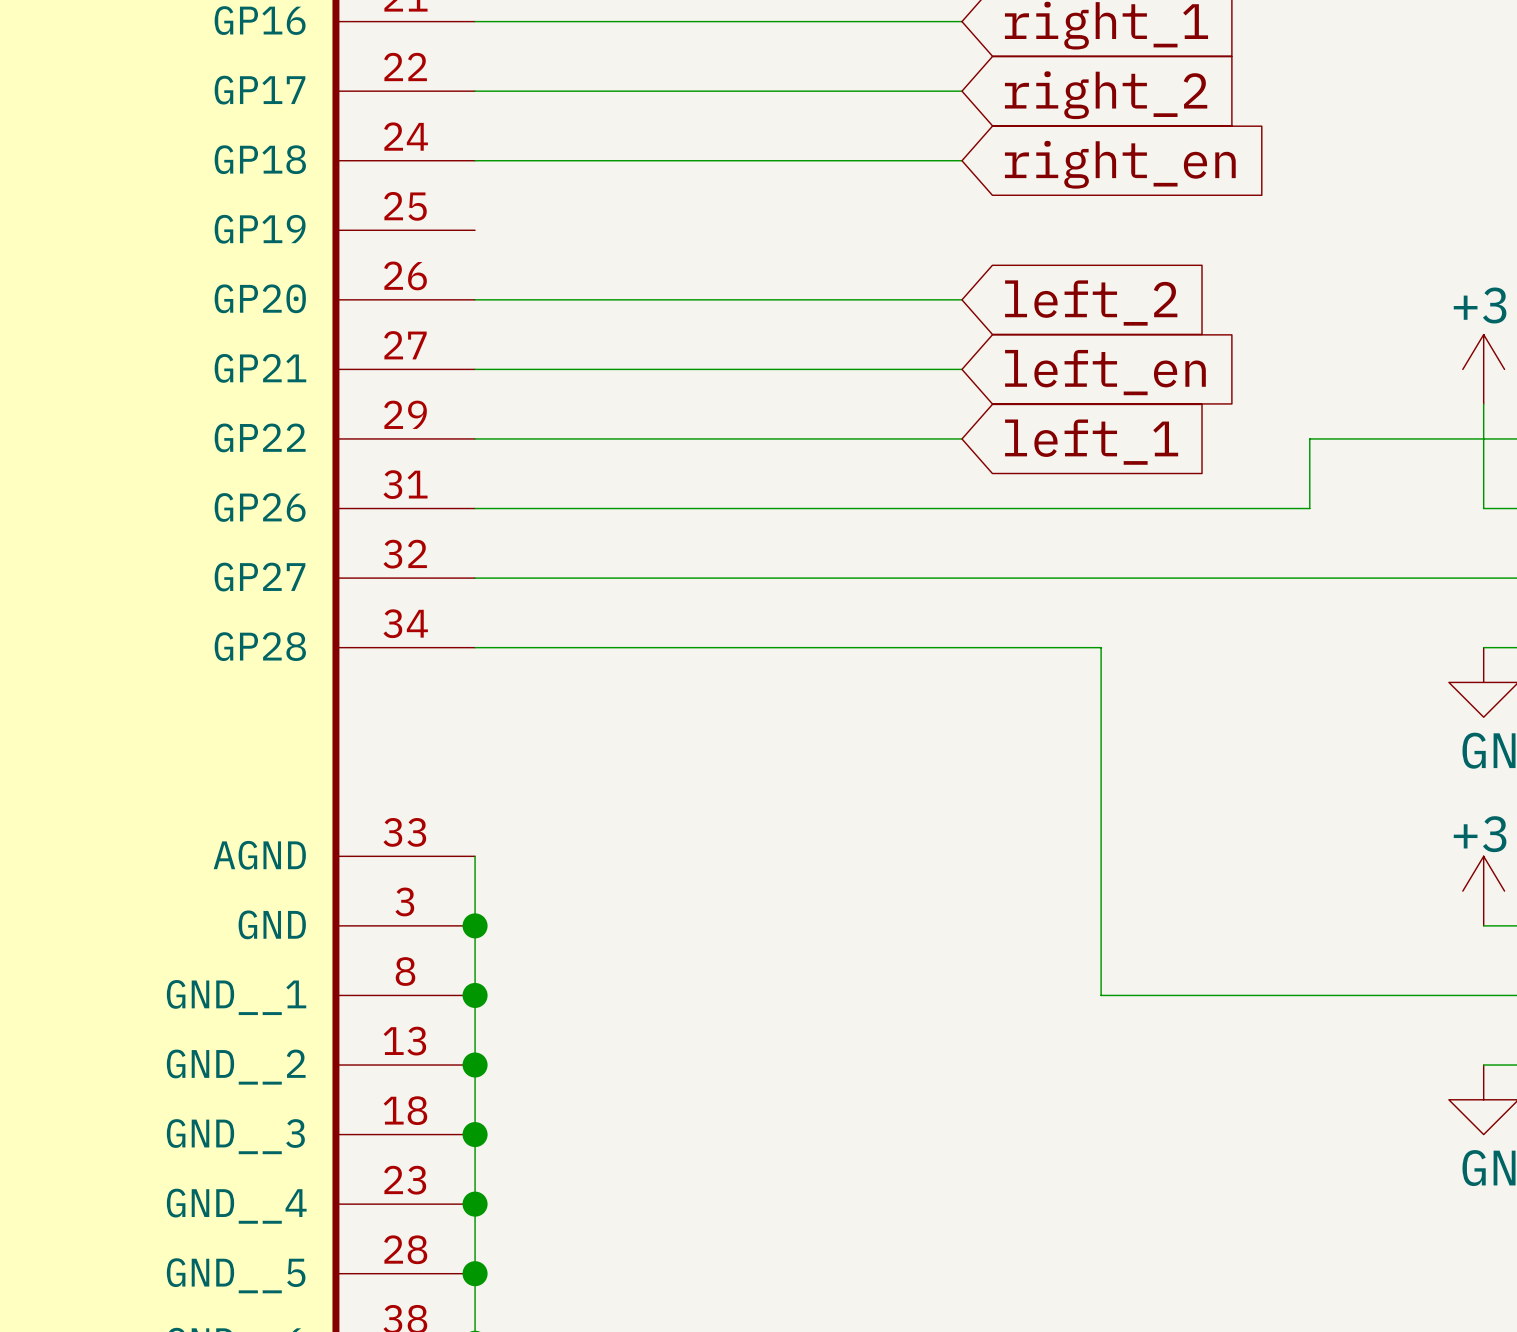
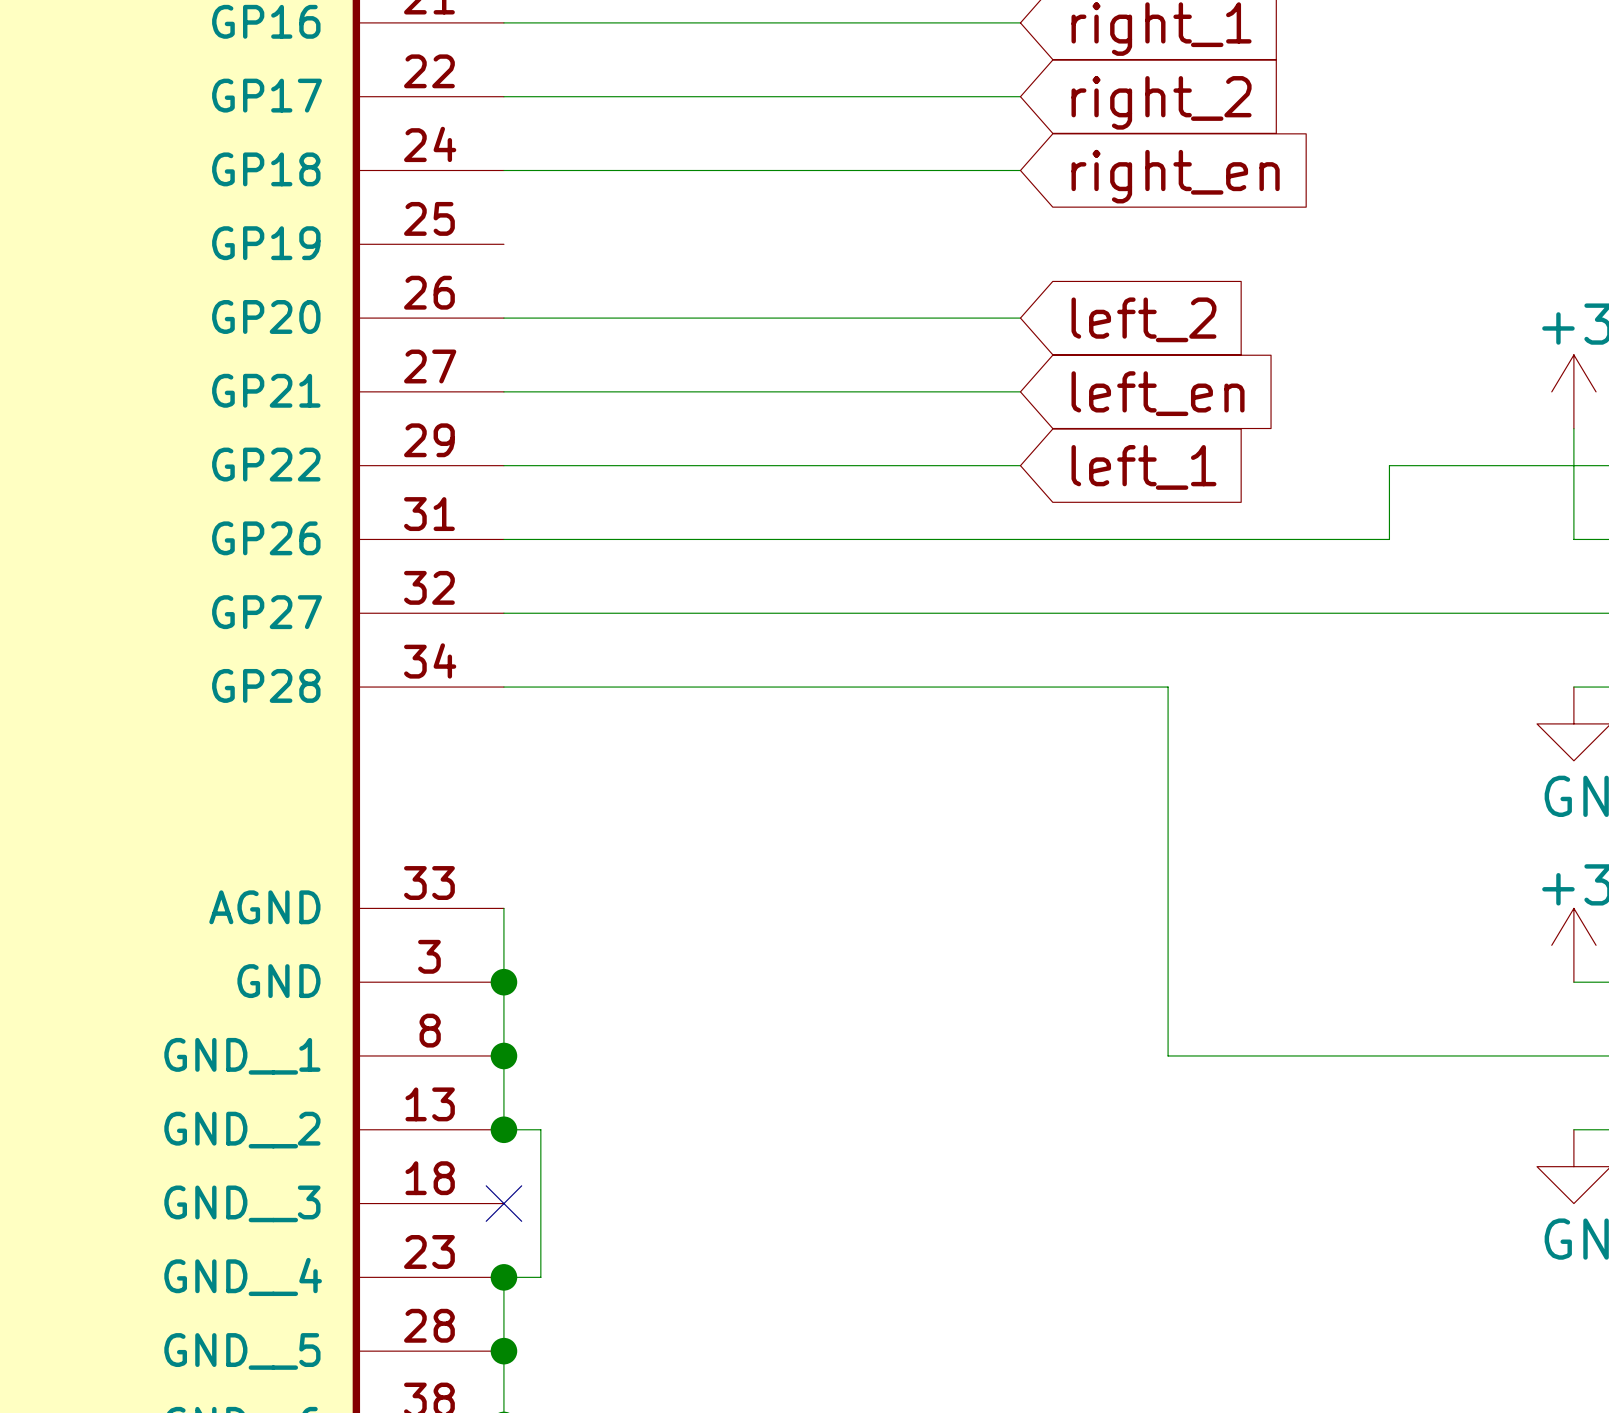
wire: (475, 1065) (475, 1204) -> (503, 1129) (540, 1129) (540, 1277) (503, 1277)
junction: (475, 1134) -> none
no-connect mark: none -> (503, 1203)

